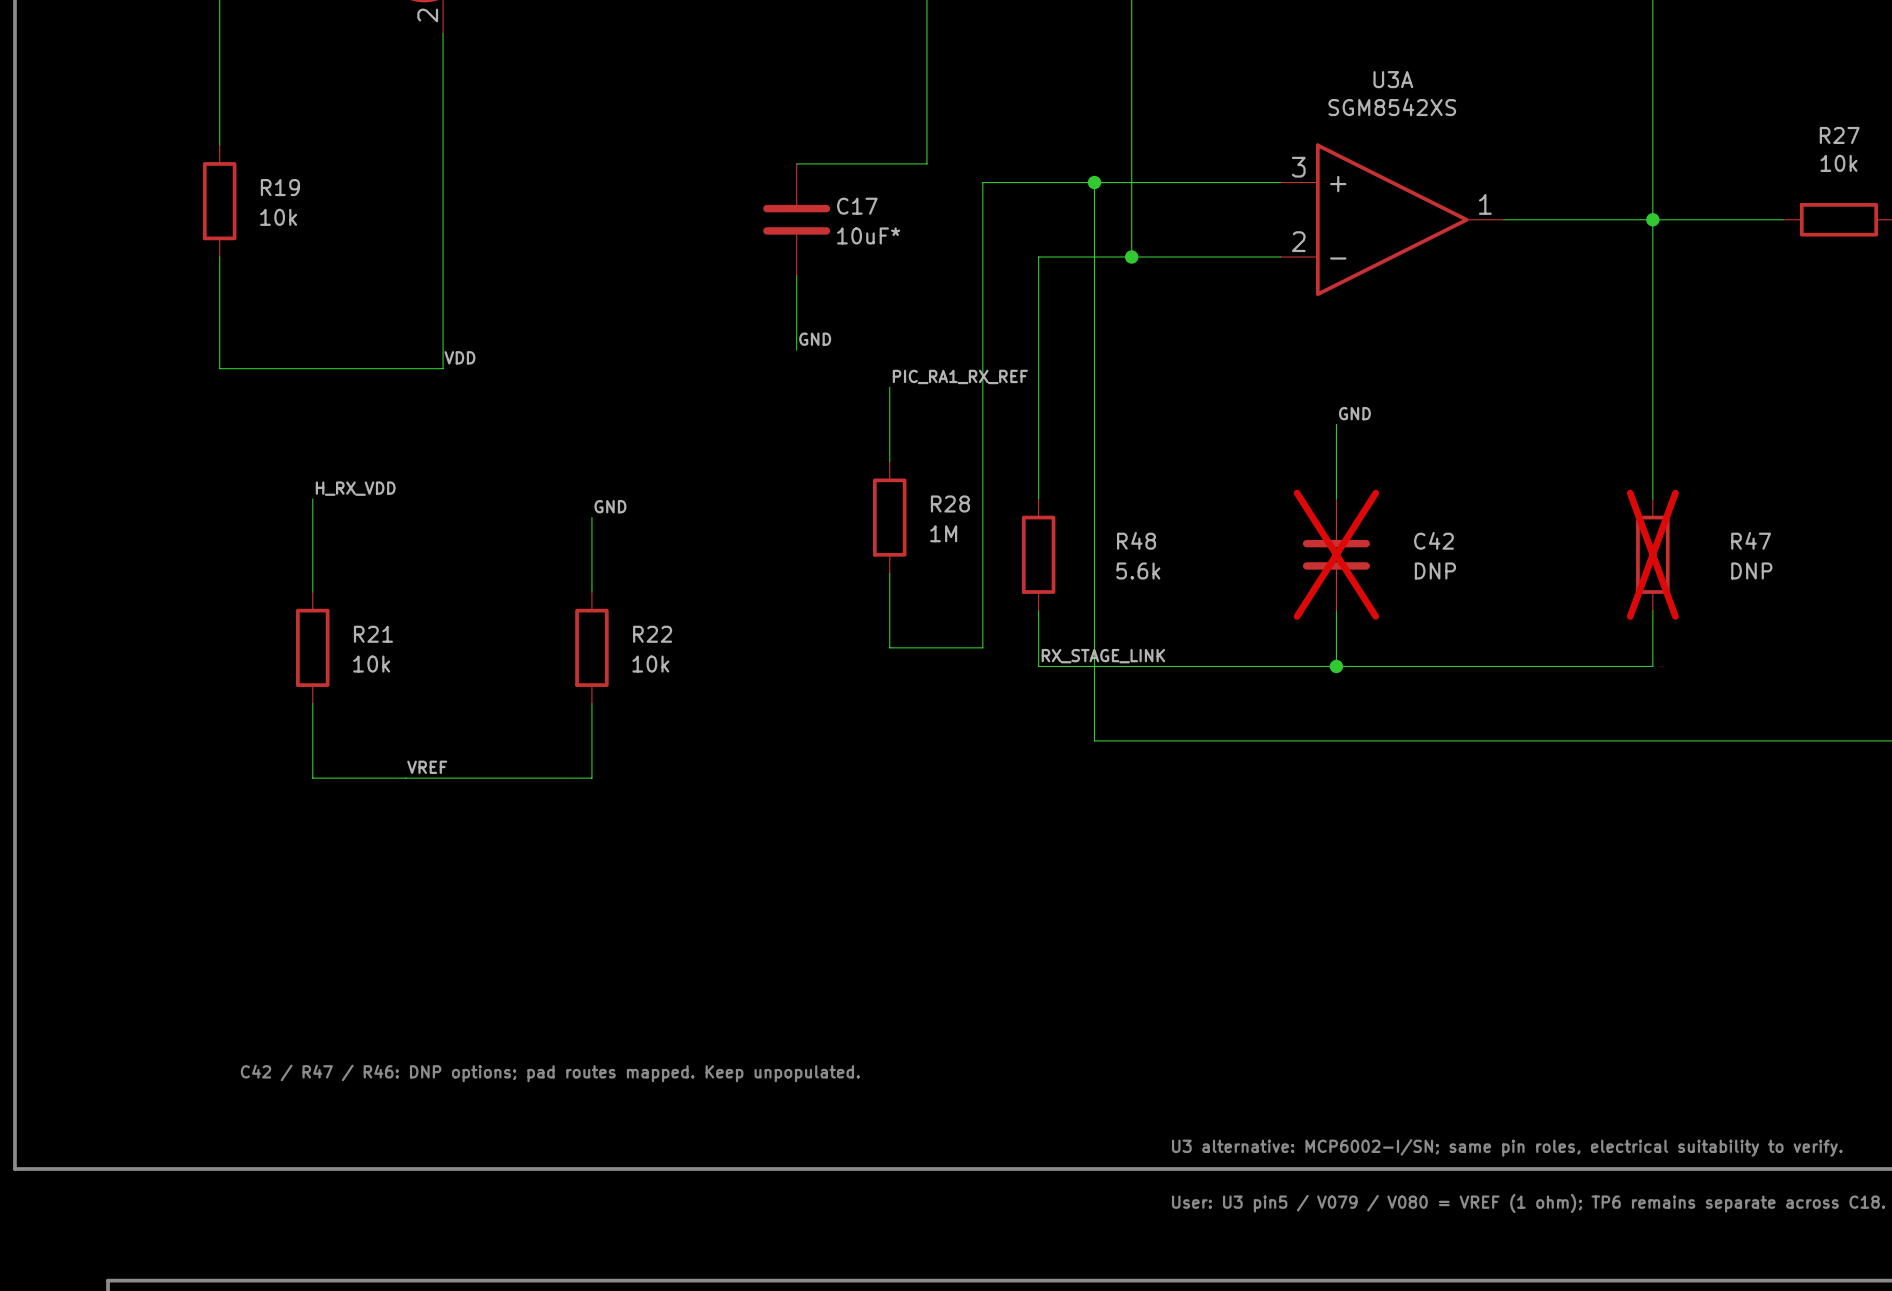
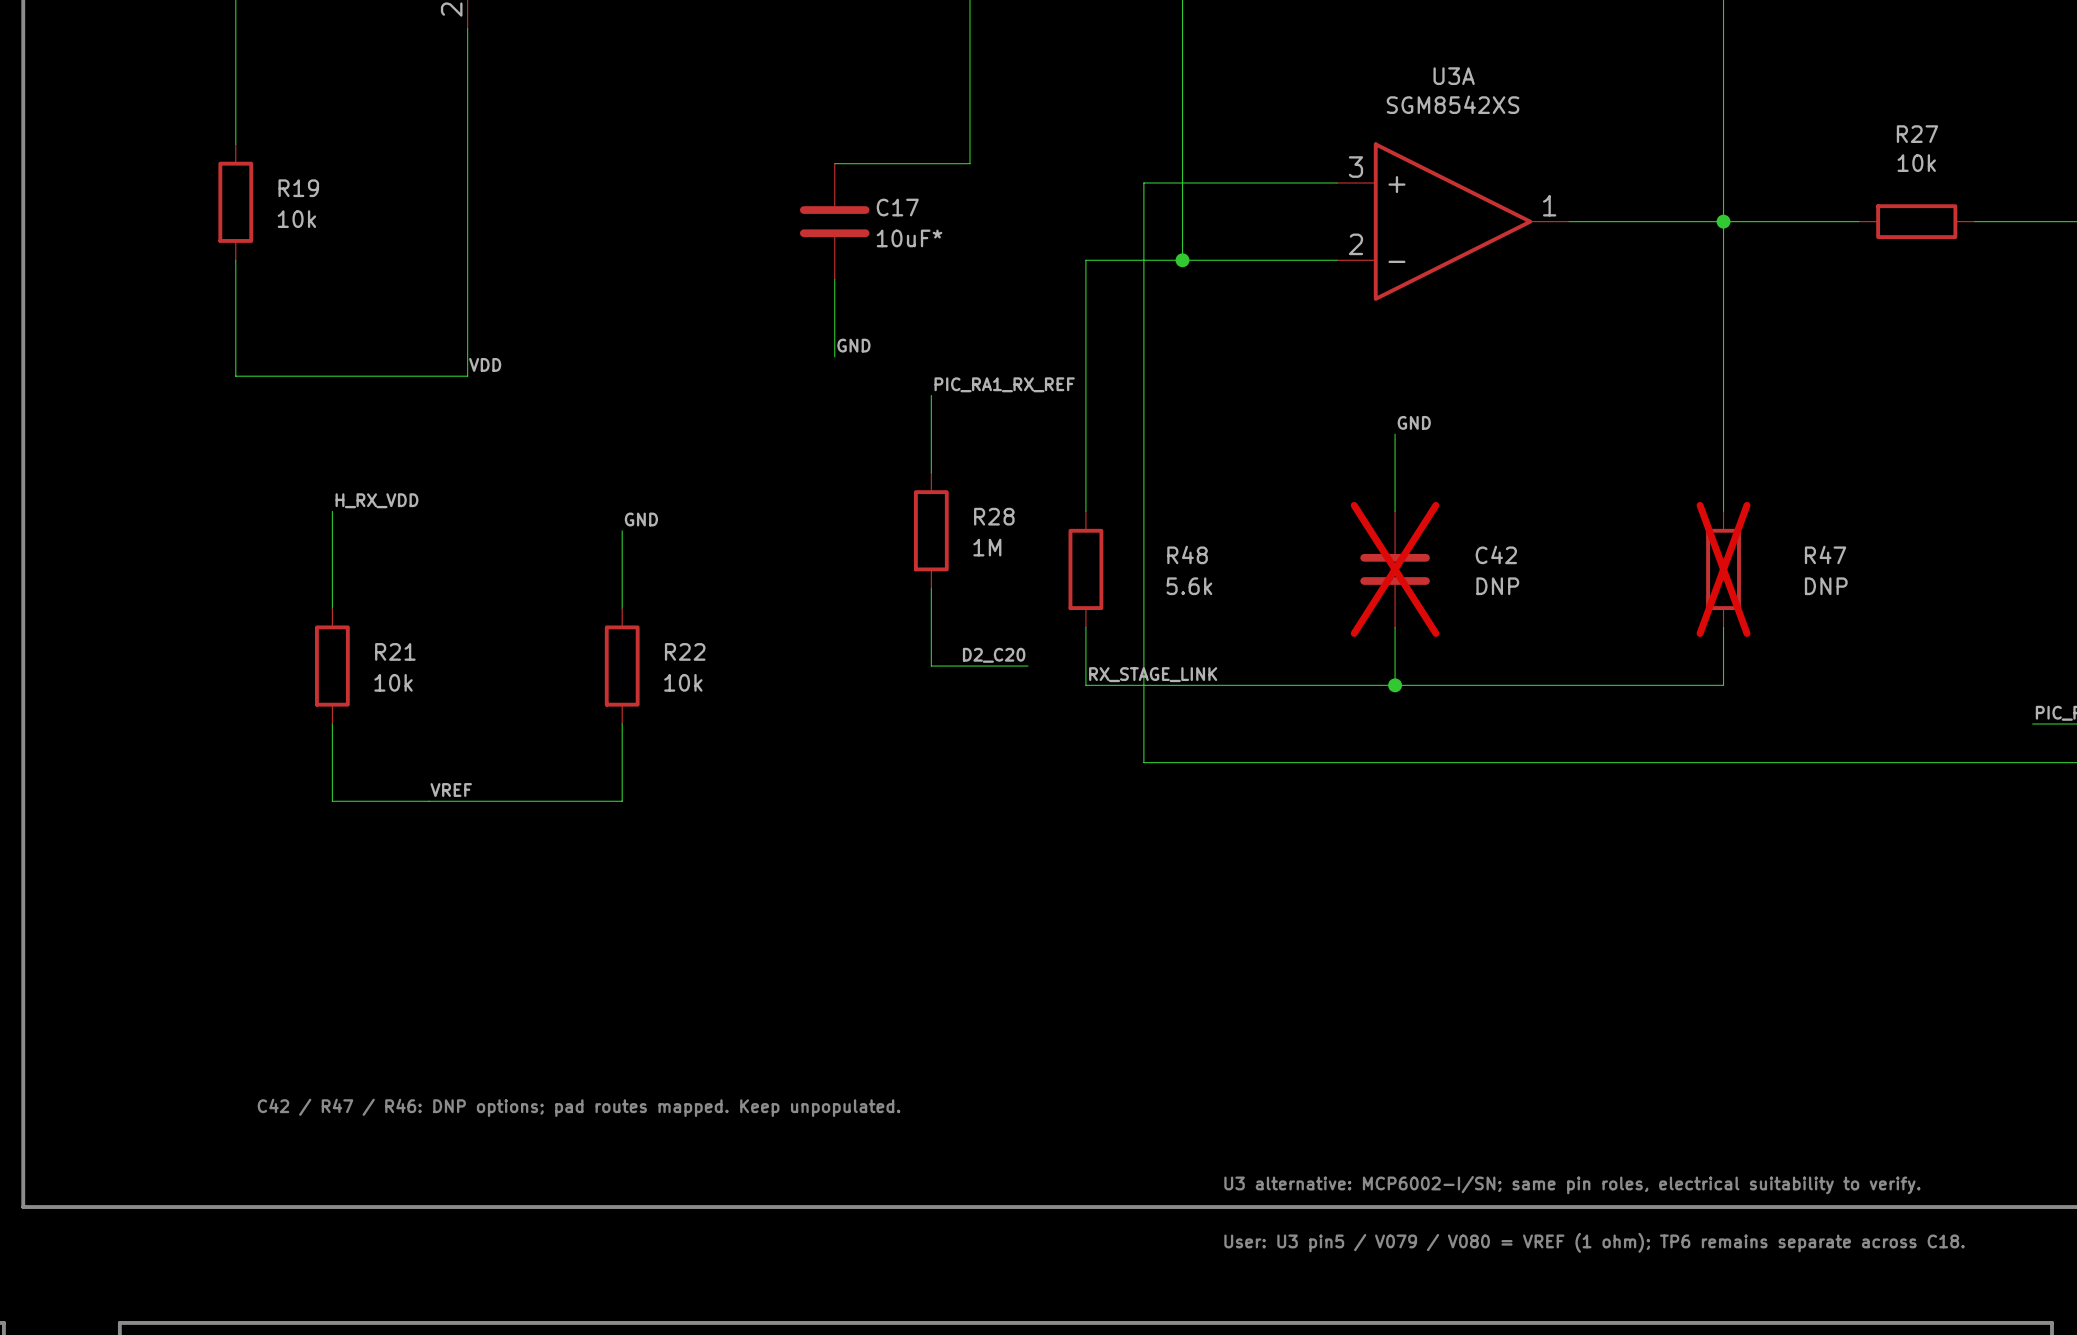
wire: (1094, 182) (982, 182) (982, 647) -> none
junction: (1094, 182) -> none
label: none -> D2_C20 (994, 655)

